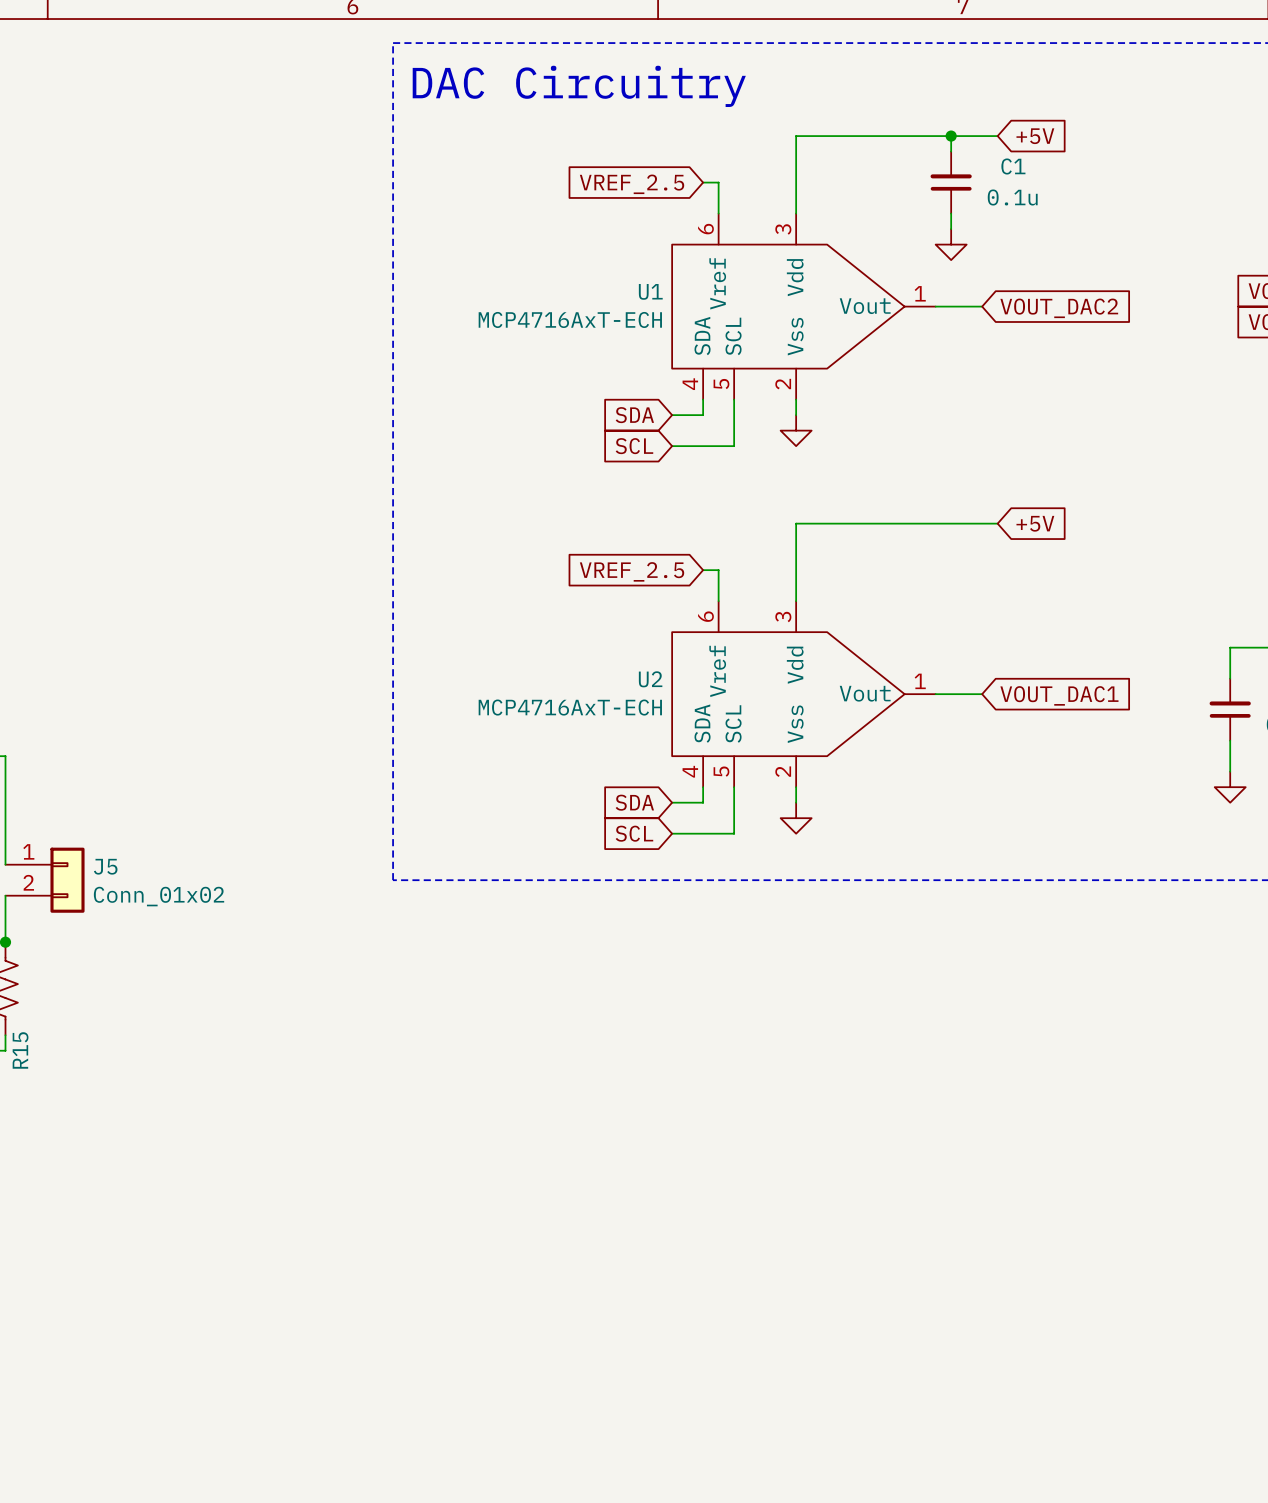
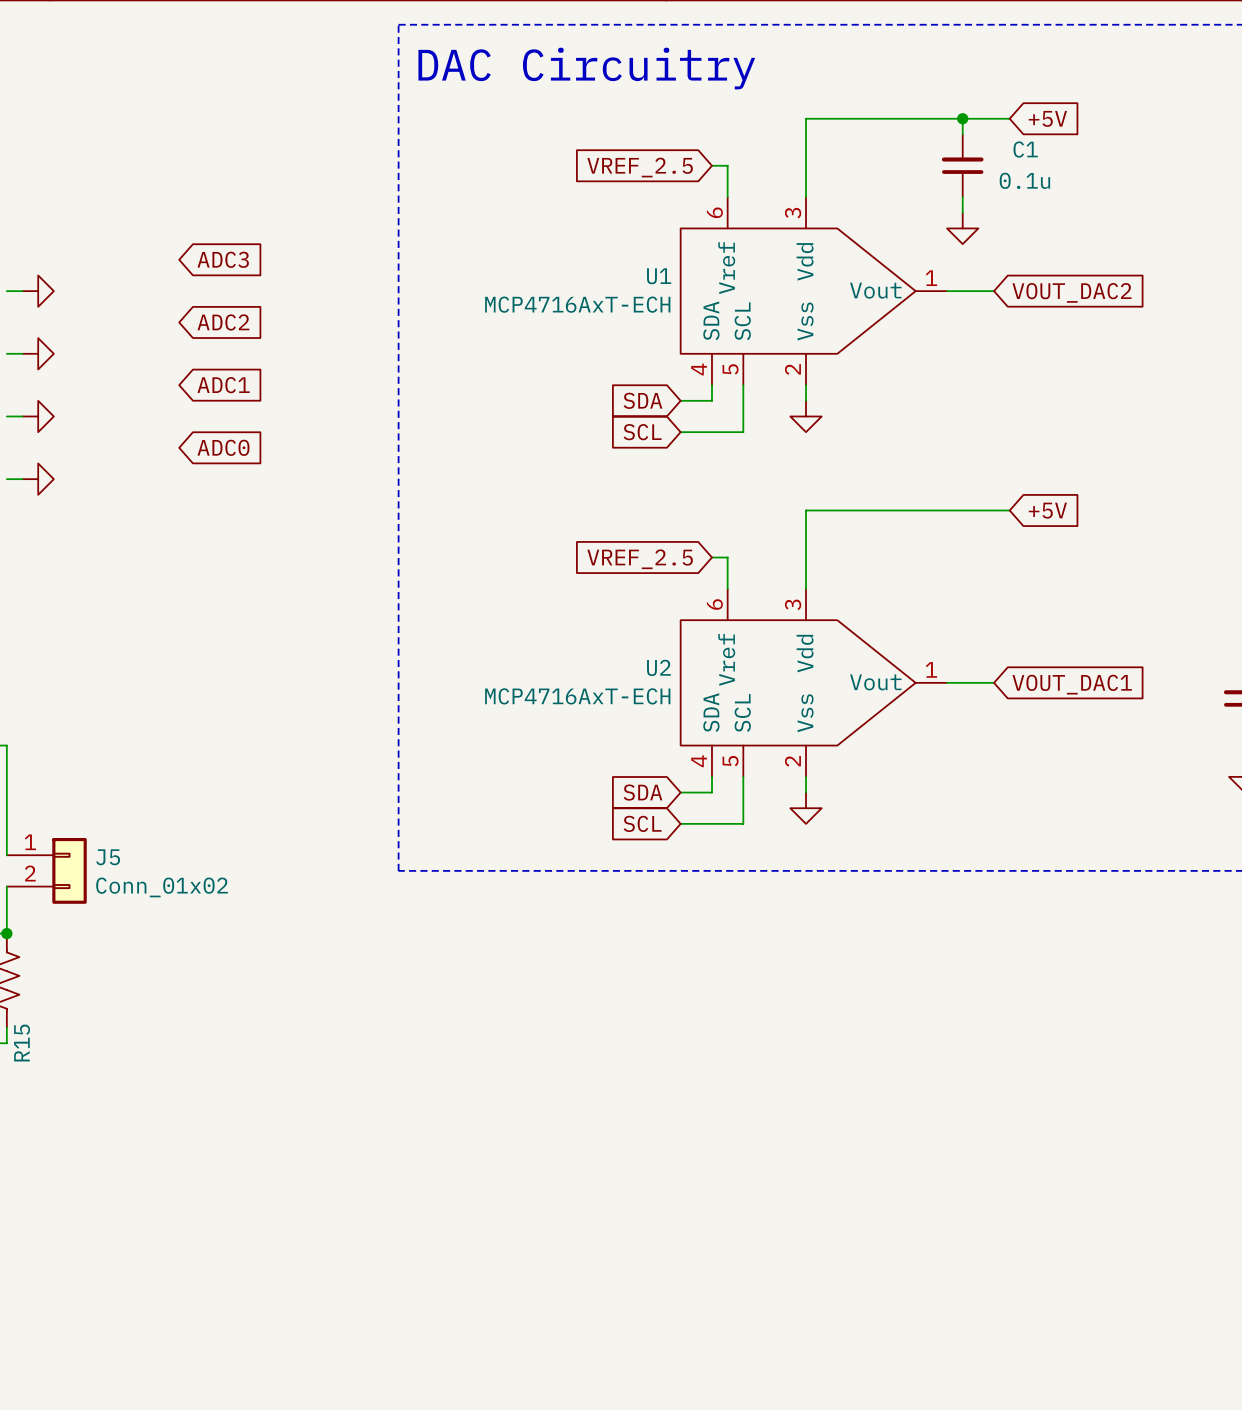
global label: none -> ADC3 (223, 259)
wire: none -> (6, 291) (22, 291)
power symbol: none -> (38, 291)
global label: none -> ADC2 (223, 322)
wire: none -> (6, 353) (22, 353)
power symbol: none -> (38, 353)
global label: none -> ADC1 (223, 385)
wire: none -> (6, 416) (22, 416)
power symbol: none -> (38, 416)
global label: none -> ADC0 (223, 447)
wire: none -> (6, 479) (22, 479)
power symbol: none -> (38, 479)

